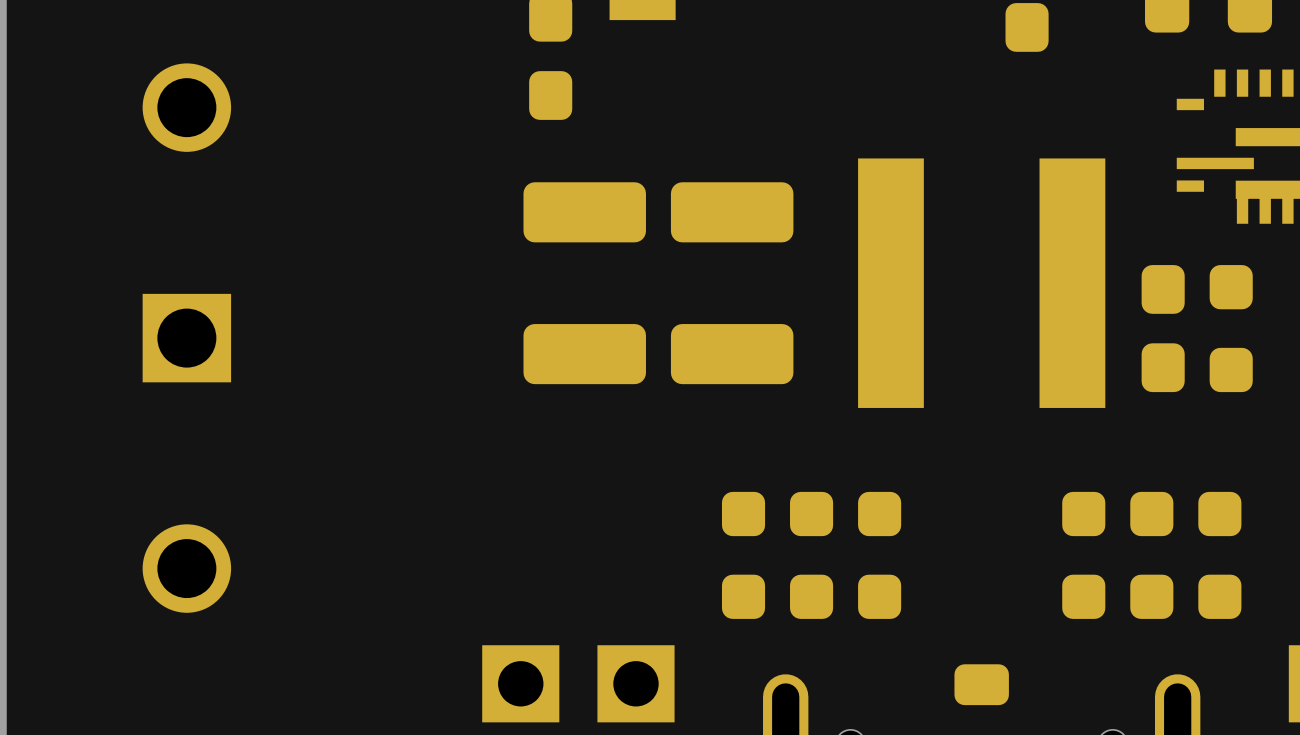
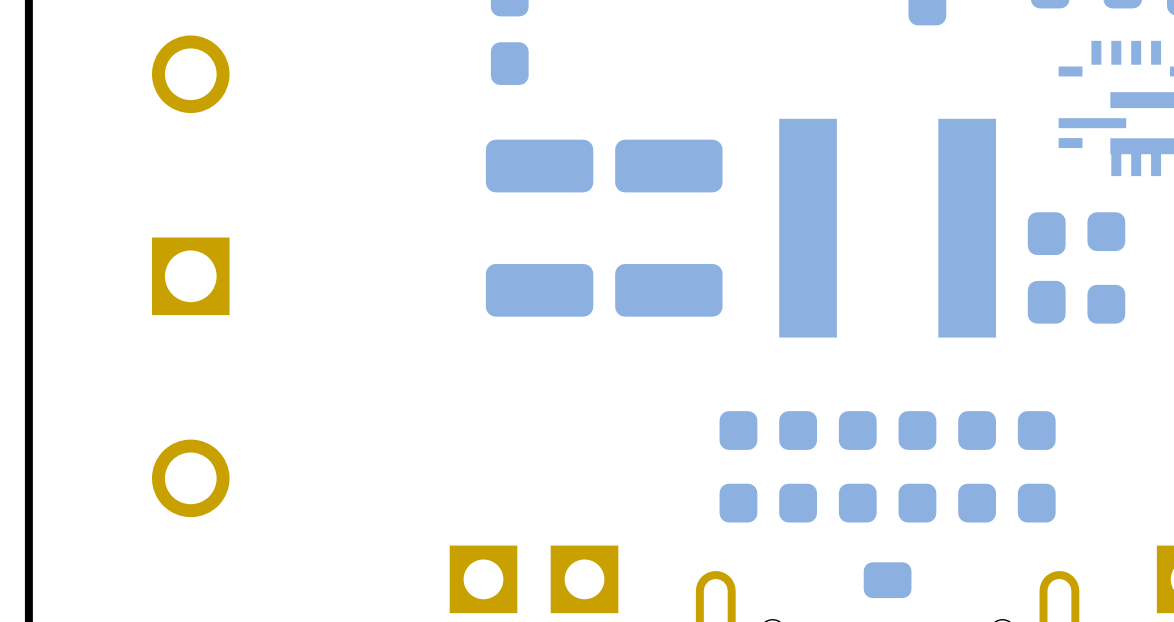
part: (743, 555) -> none
part: none -> (857, 466)
part: none -> (917, 466)
part: (1219, 555) -> none

